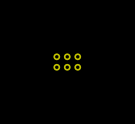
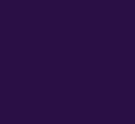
part: (67, 62) -> none

